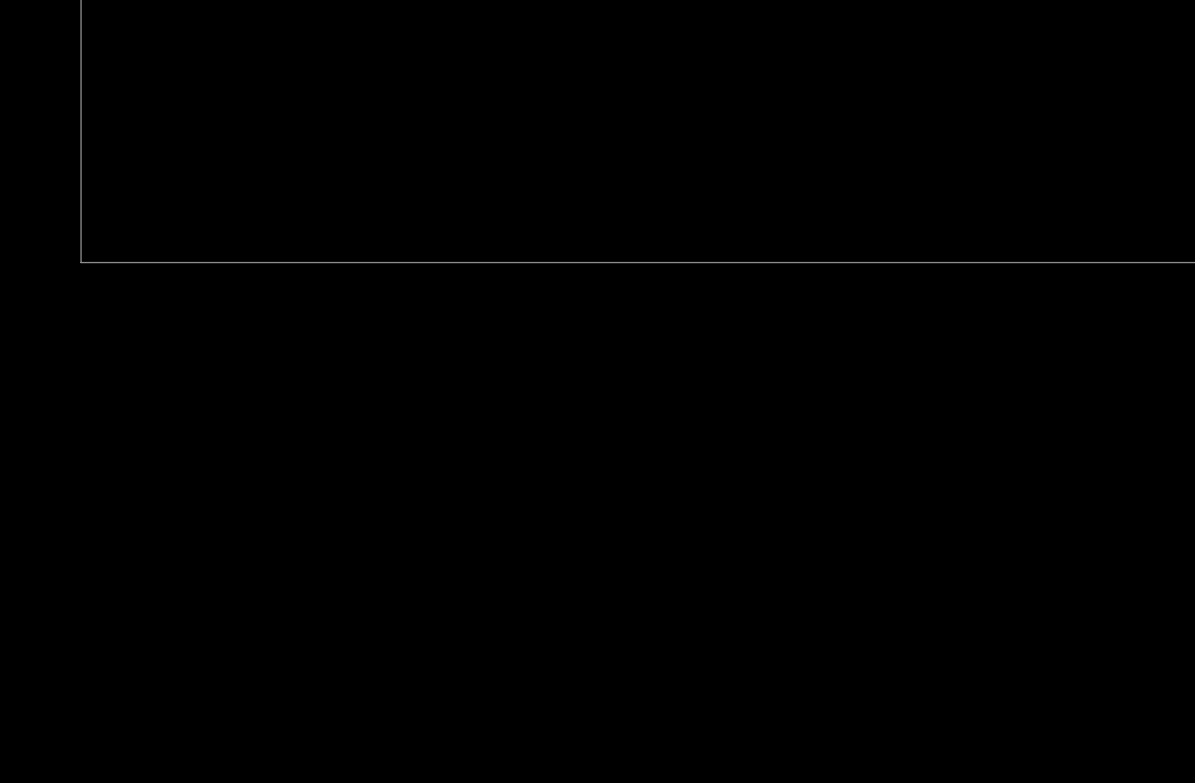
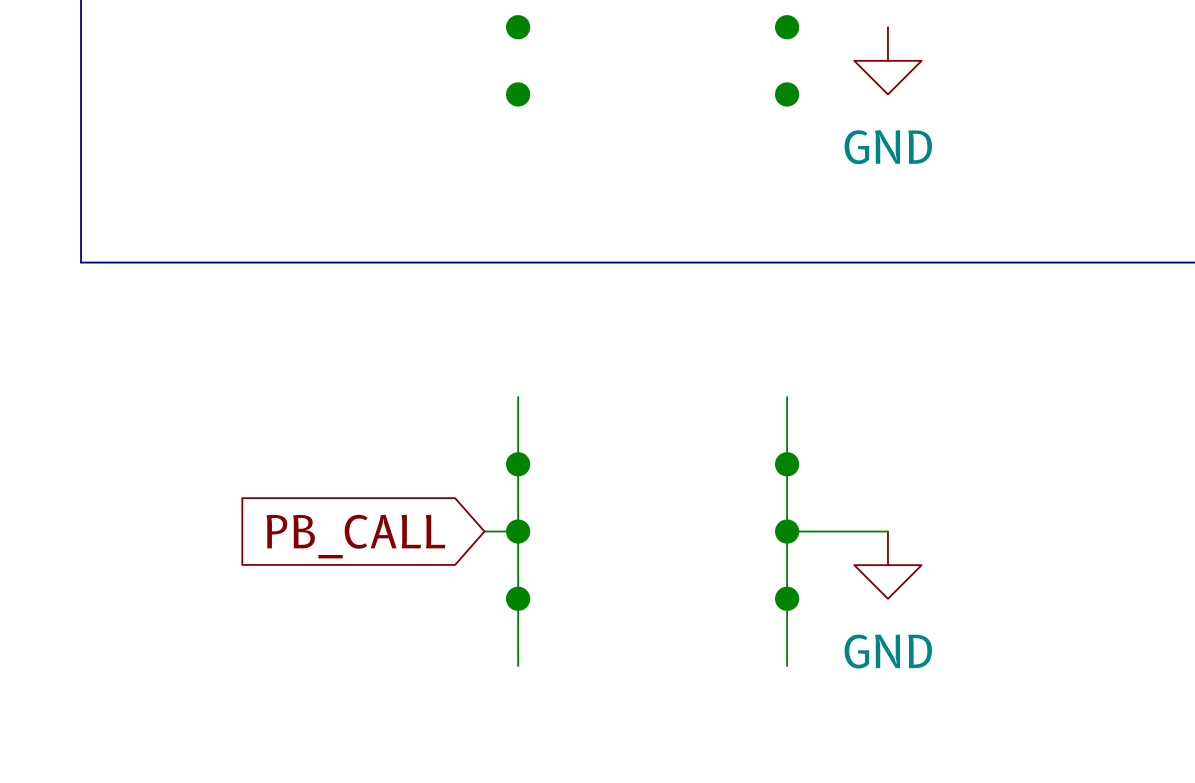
junction: none -> (518, 27)
junction: none -> (787, 27)
power symbol: none -> GND (887, 60)
junction: none -> (518, 94)
junction: none -> (787, 94)
wire: none -> (518, 397) (518, 666)
wire: none -> (787, 397) (787, 666)
junction: none -> (518, 464)
junction: none -> (787, 464)
global label: none -> PB_CALL (355, 536)
wire: none -> (484, 531) (518, 531)
junction: none -> (518, 531)
wire: none -> (787, 531) (887, 531)
junction: none -> (787, 531)
power symbol: none -> GND (887, 565)
junction: none -> (518, 598)
junction: none -> (787, 598)

